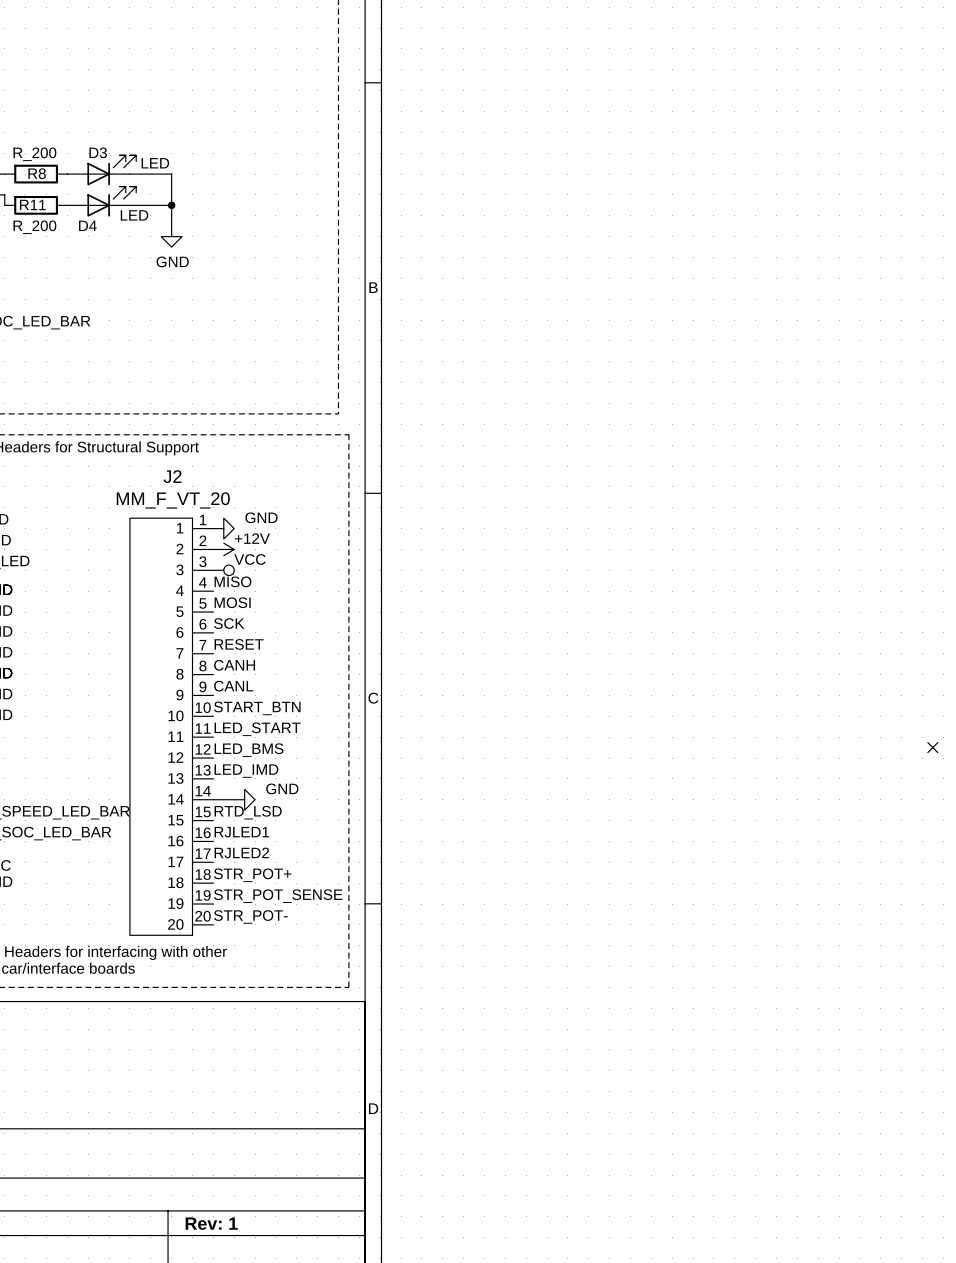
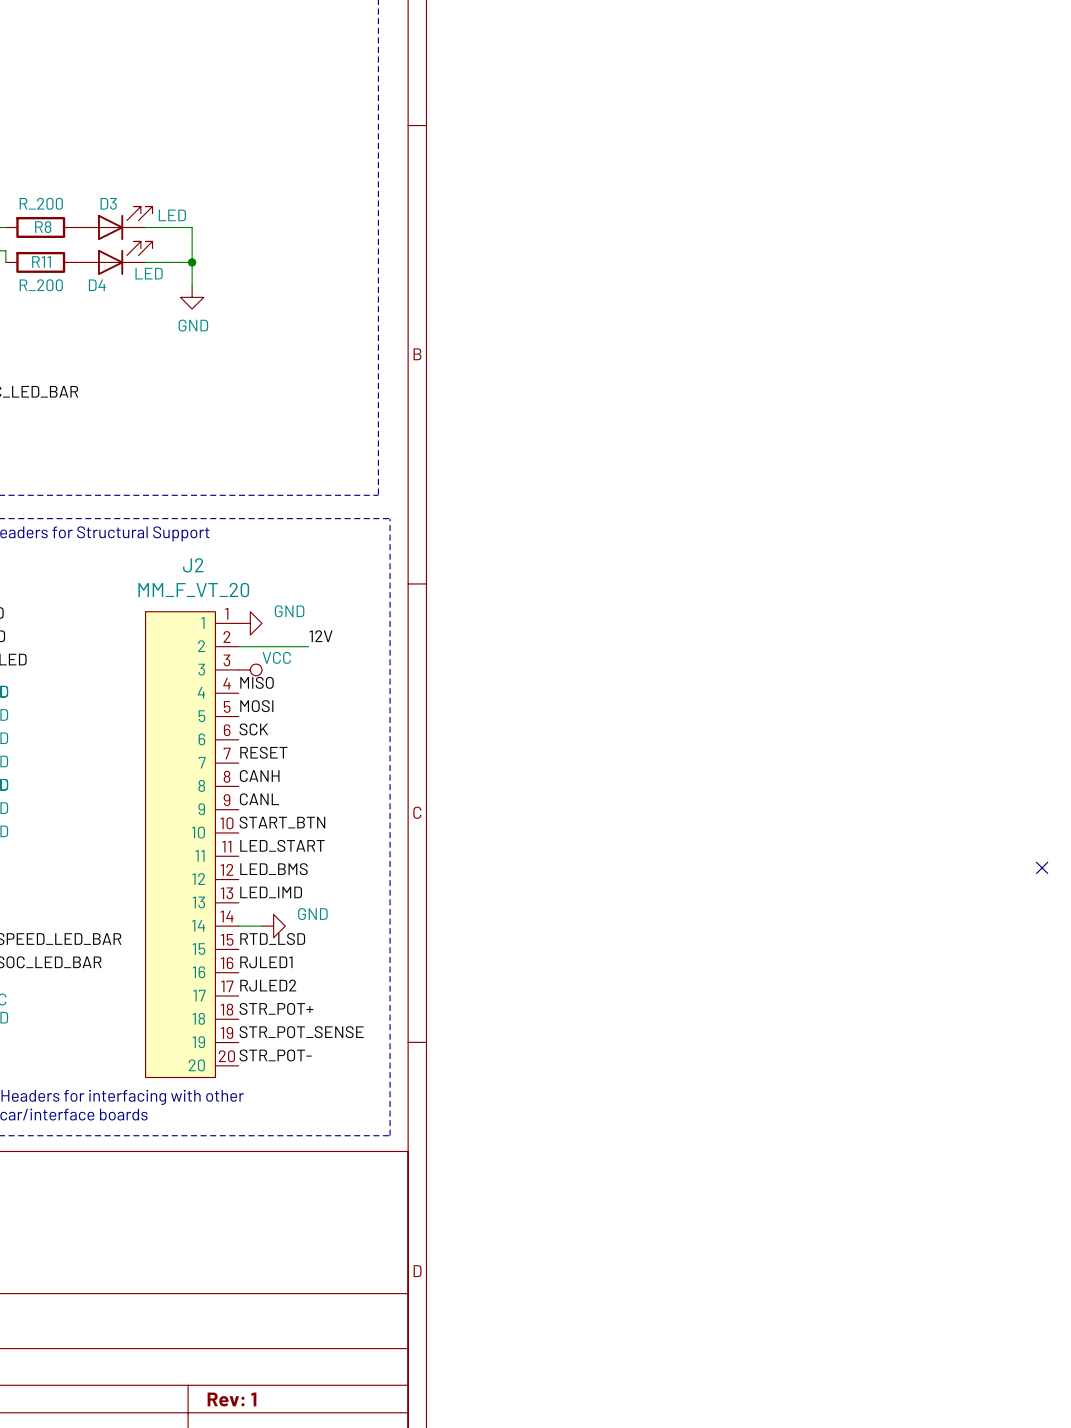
label: none -> 12V (321, 636)
wire: none -> (238, 646) (308, 646)
power symbol: +12V (223, 549) -> none

